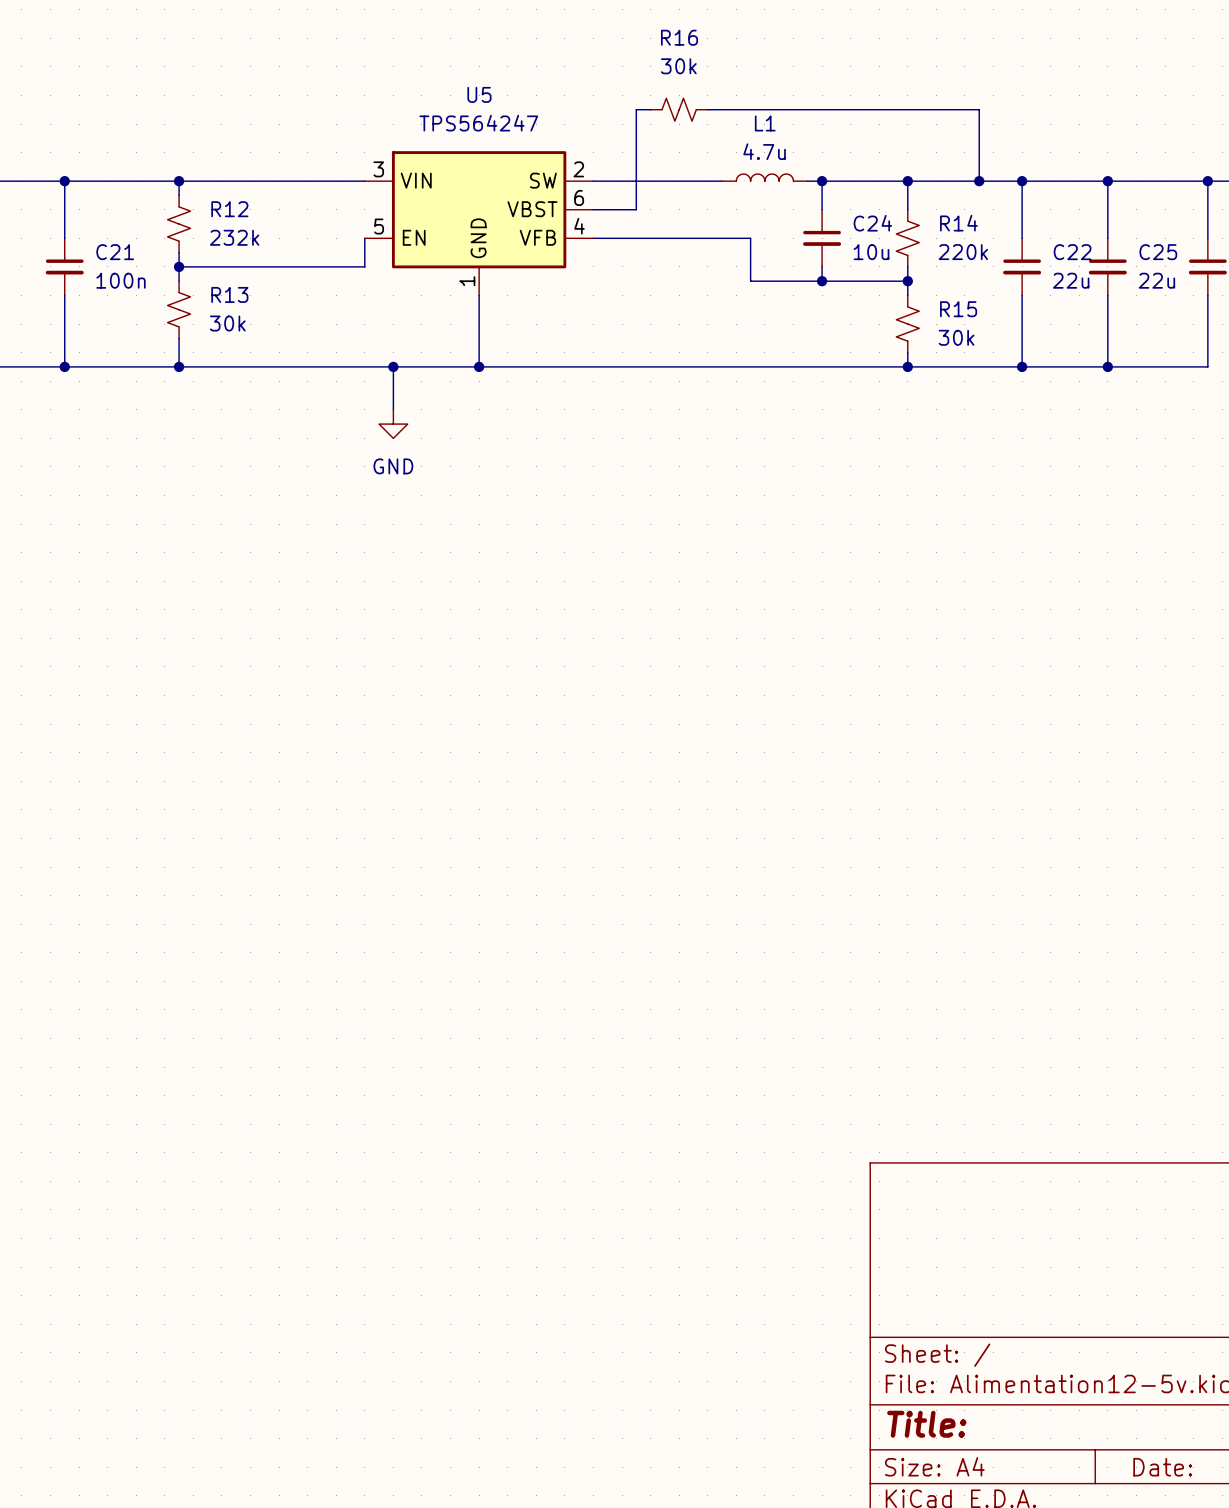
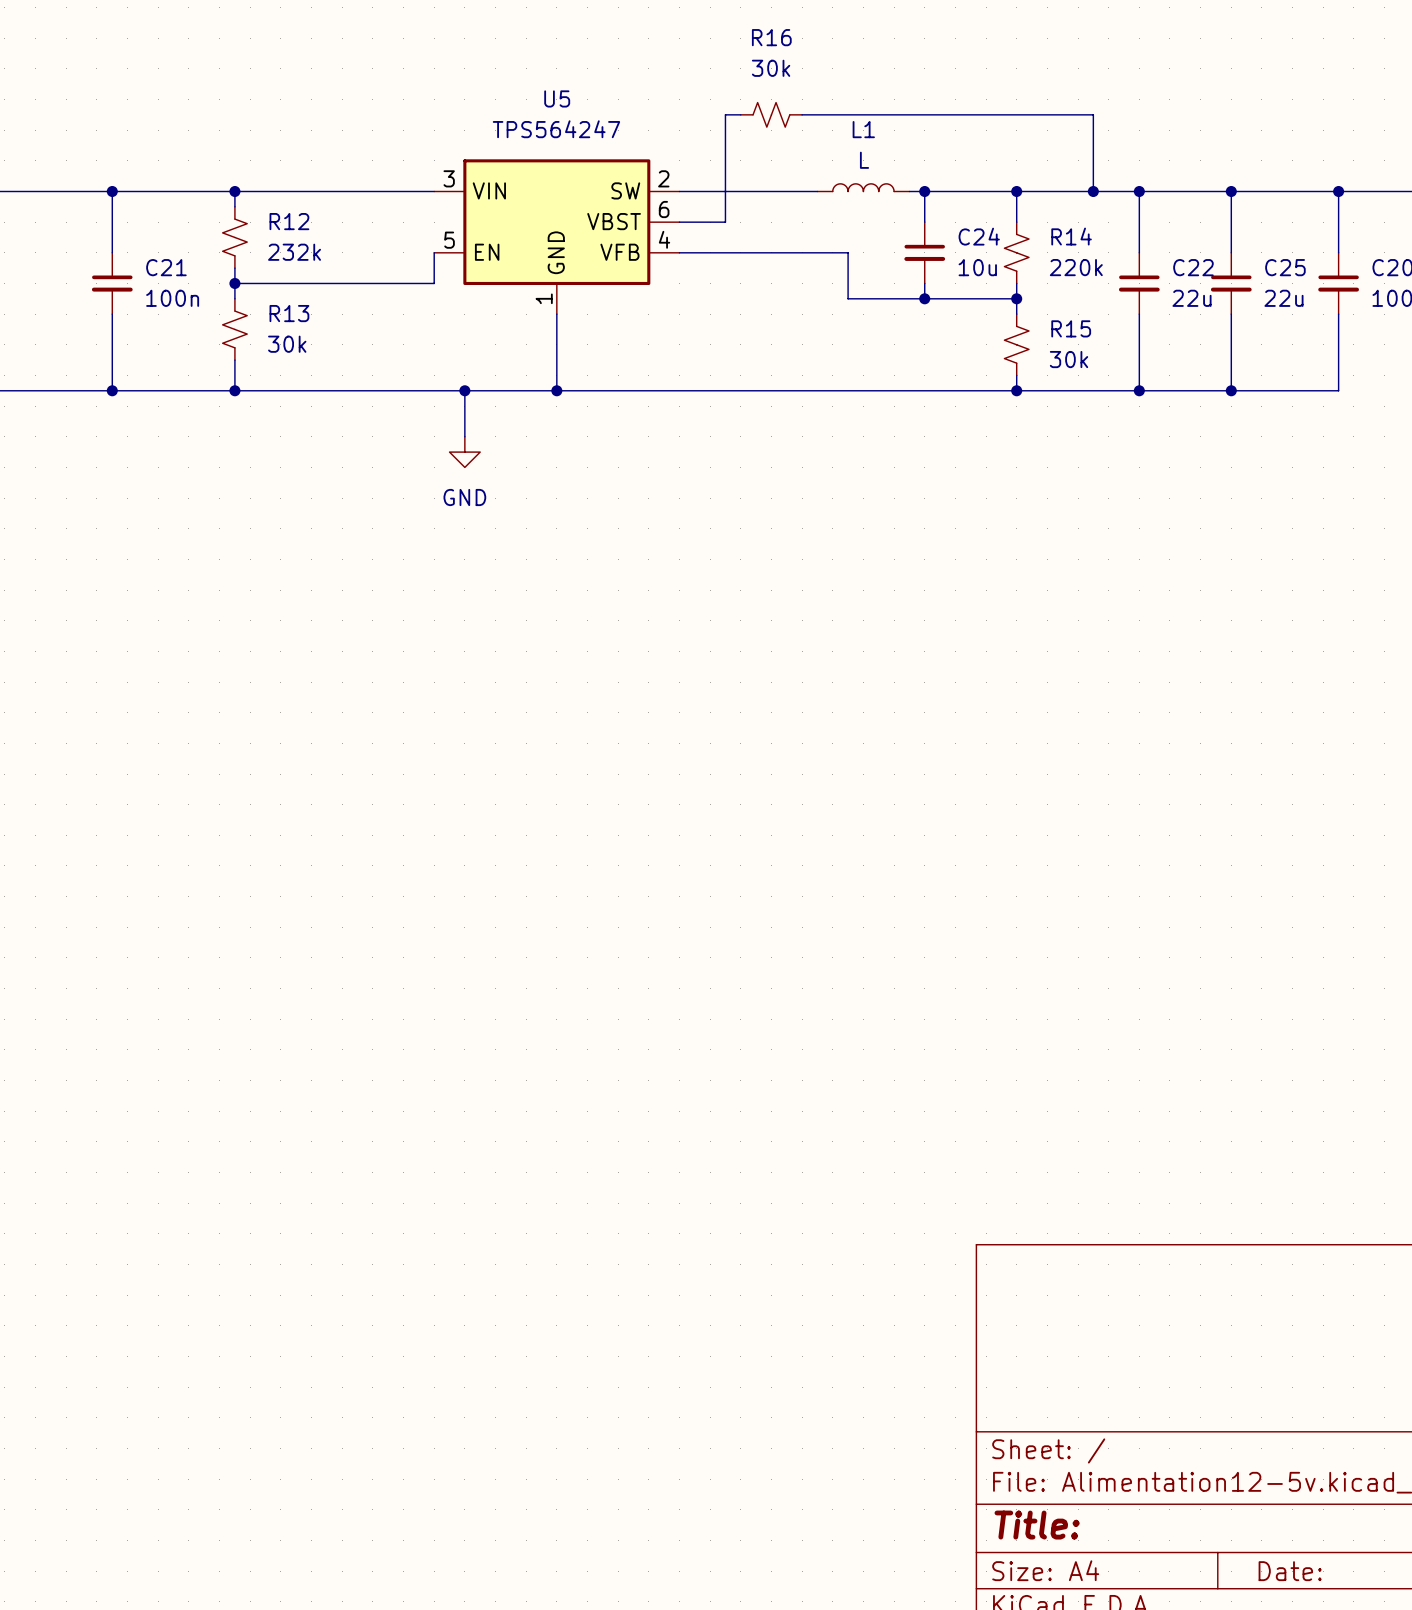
L1 value: 4.7u (764, 151) -> L (864, 160)

